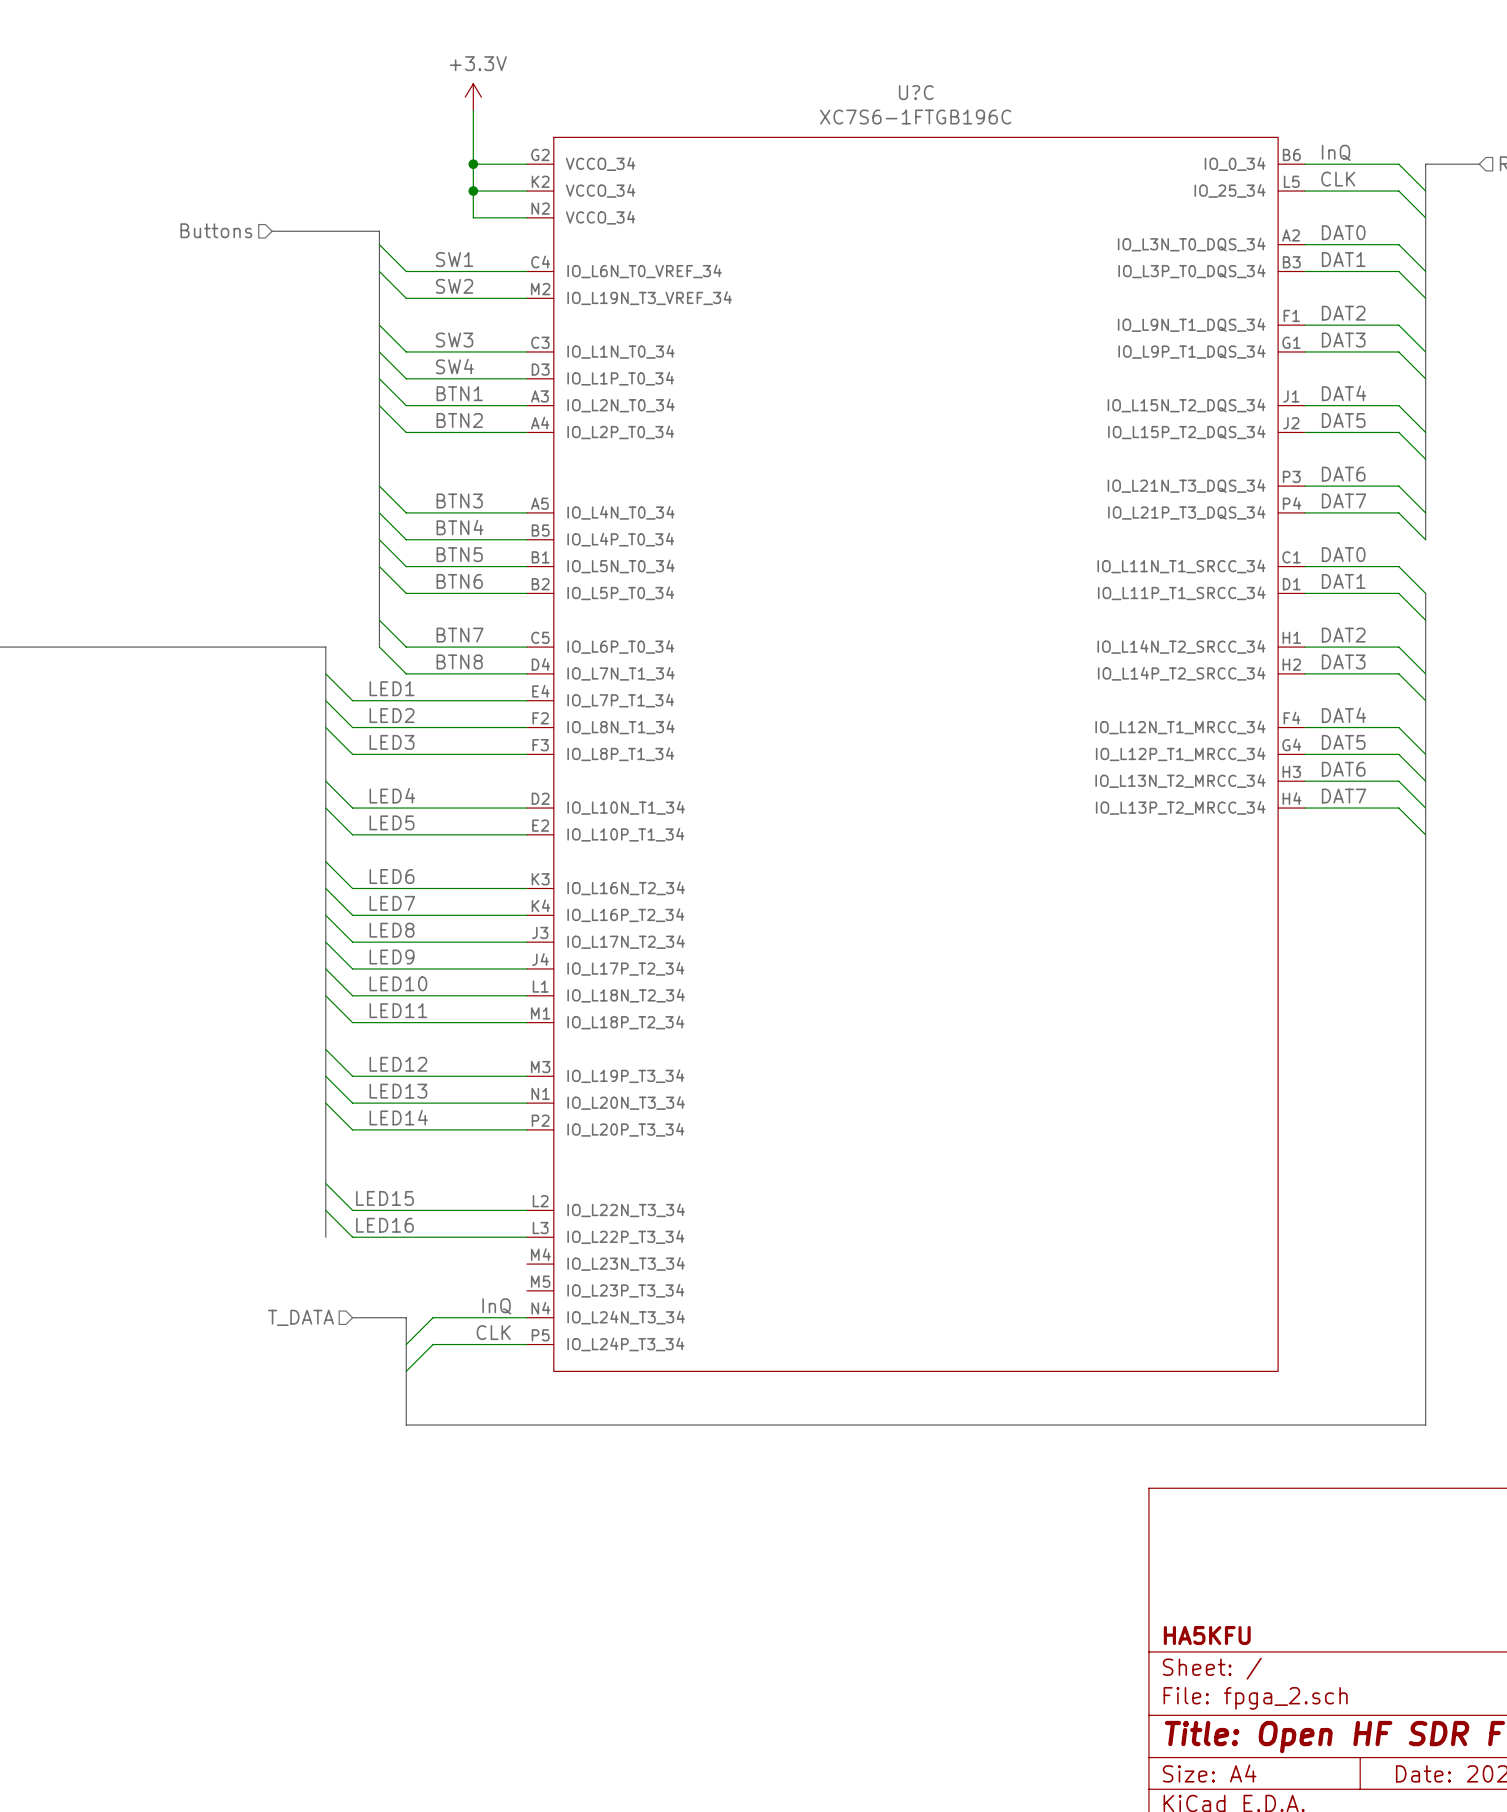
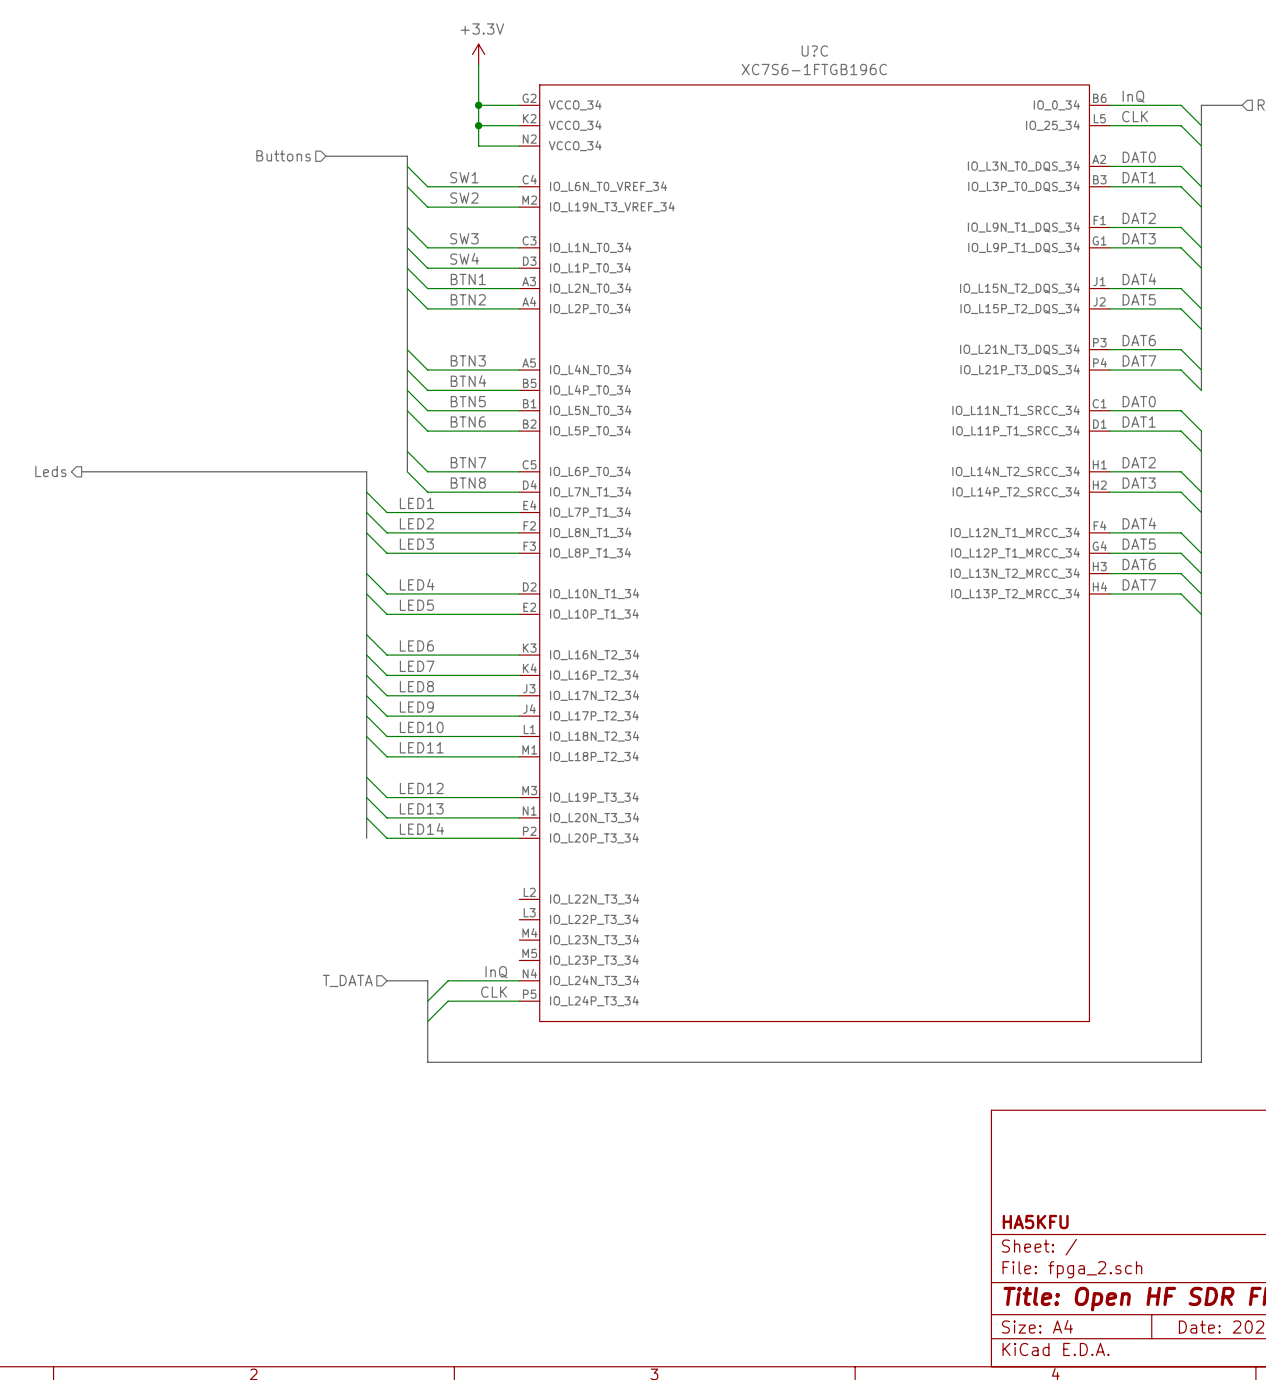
bus: (325, 1129) (325, 1237) -> none
wire: (325, 1183) (352, 1210) (526, 1210) -> none
label: LED15 (384, 1198) -> none
wire: (325, 1210) (352, 1237) (526, 1237) -> none
label: LED16 (384, 1225) -> none

